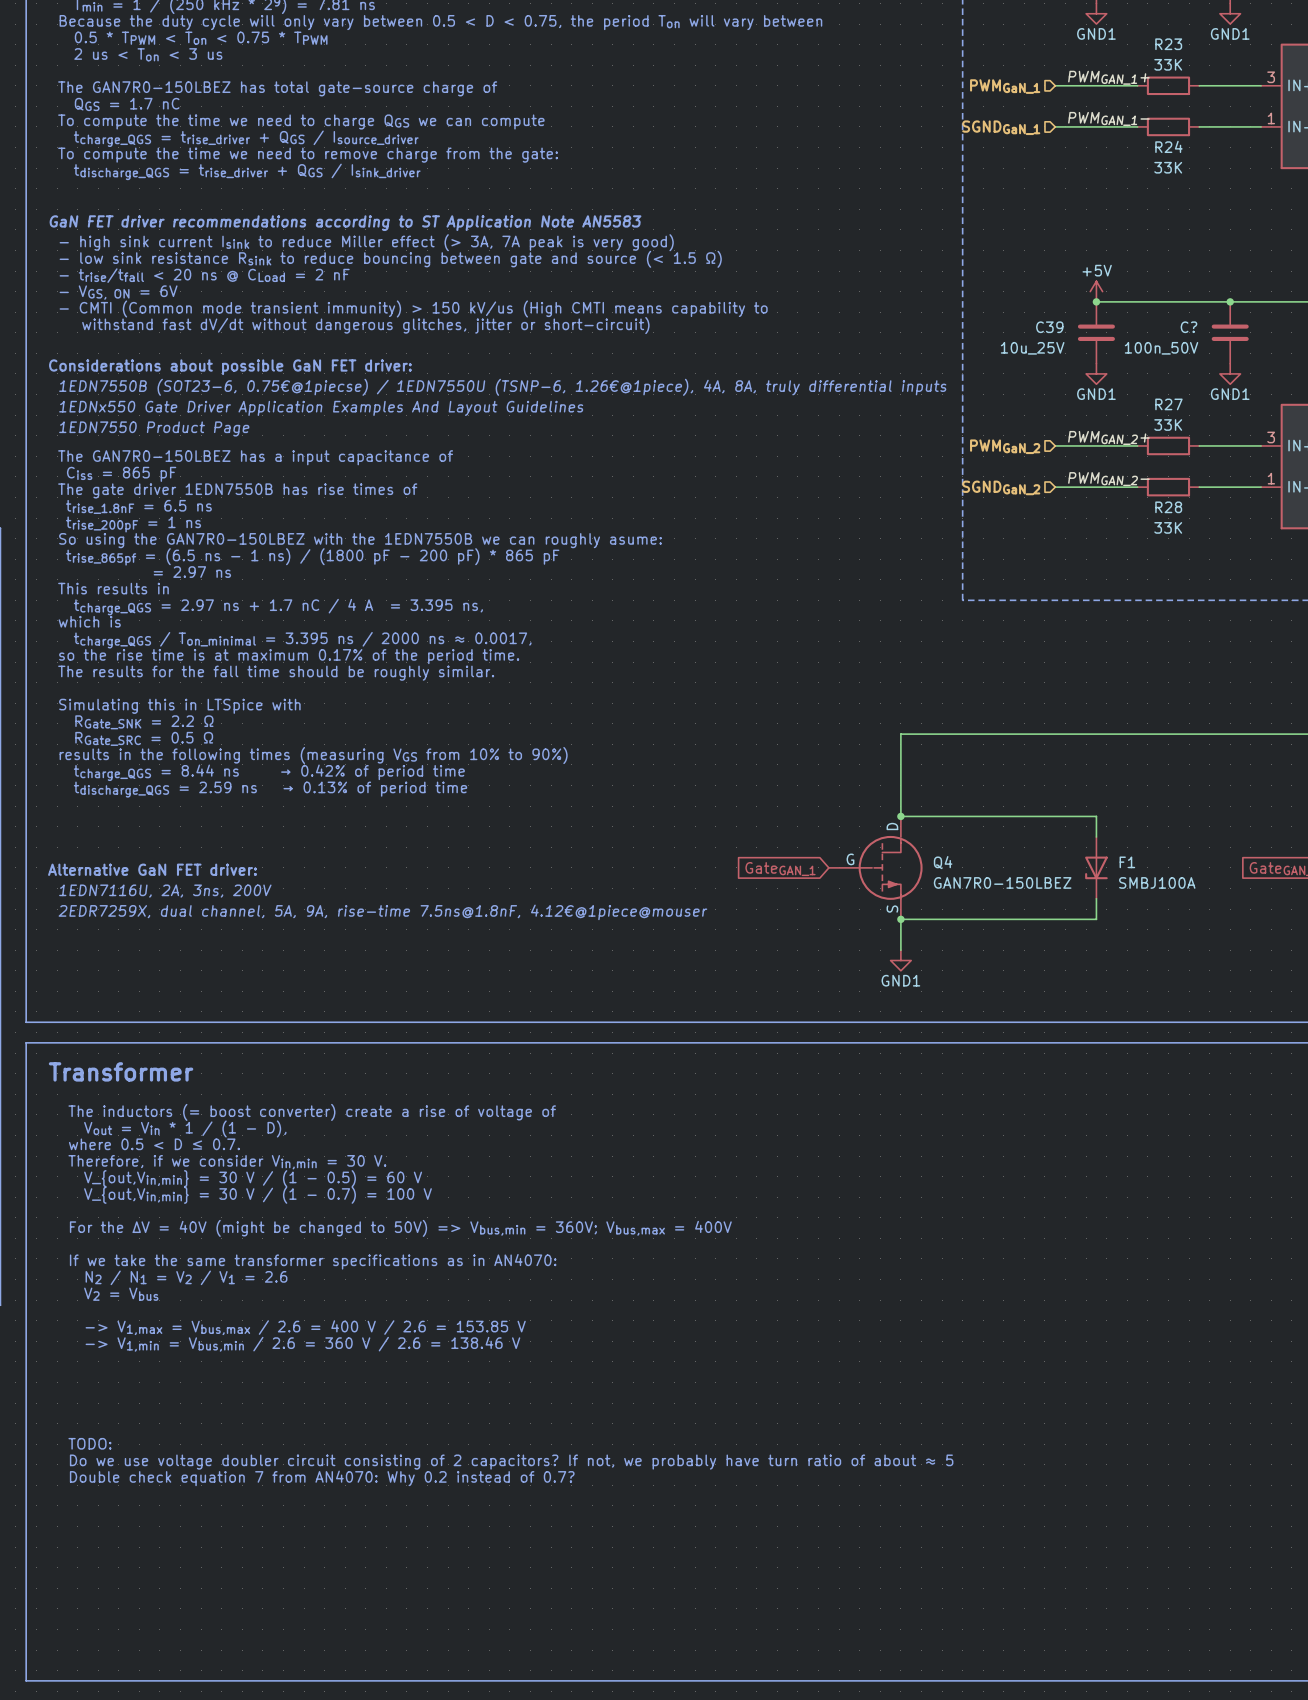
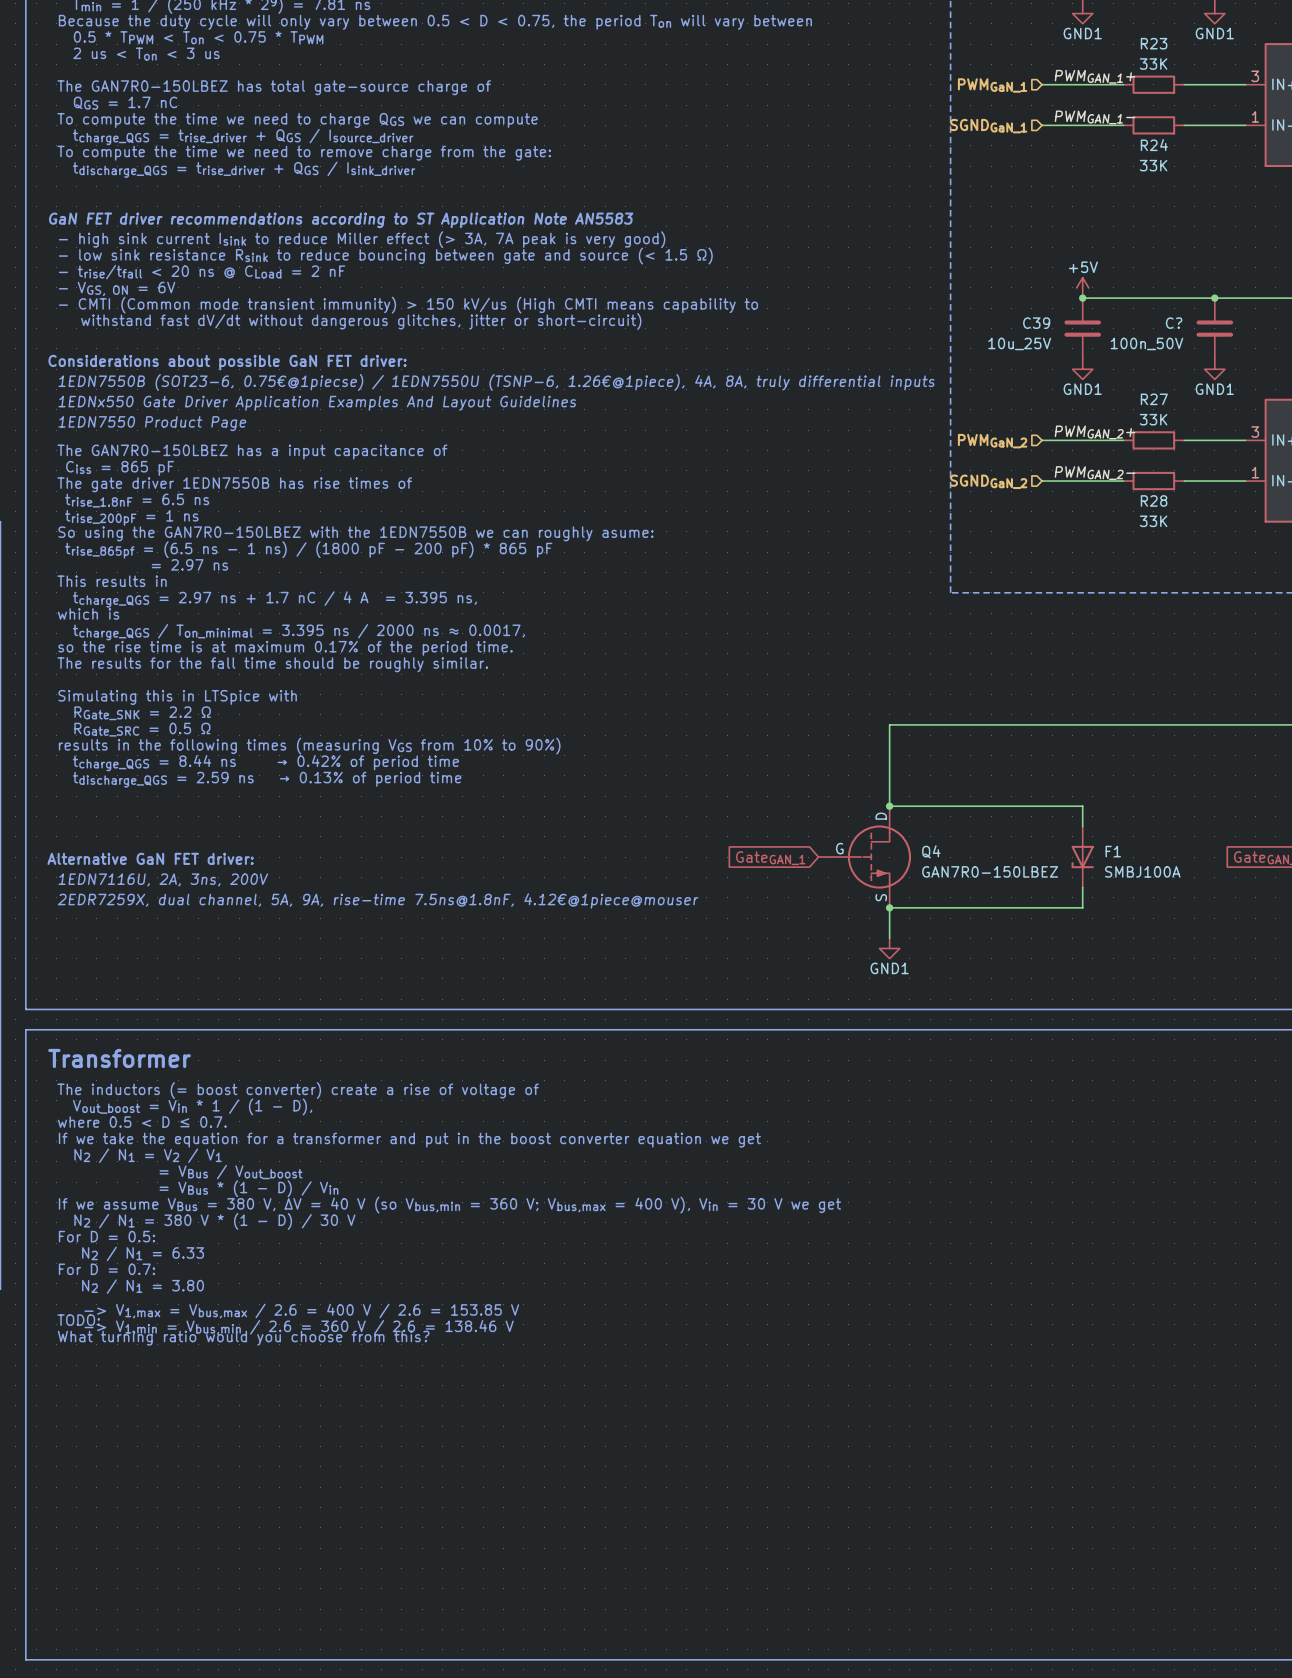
text position: The inductors (= boost converter) create a rise of voltage of (312, 1112) -> The inductors (= boost converter) create a rise of voltage of (298, 1090)
text: Vout = Vin * 1 / (1 - D), (185, 1128) -> Vout_boost = Vin * 1 / (1 - D), (192, 1106)
text position: where 0.5 < D ≤ 0.7. (154, 1144) -> where 0.5 < D ≤ 0.7. (142, 1122)
text: none -> If we take the equation for a transformer and put in the boost converter equation we get (409, 1140)
text: Therefore, if we consider Vin,min = 30 V. (227, 1162) -> none
text: none -> N2 / N1 = V2 / V1 (148, 1155)
text: V_{out,Vin,min} = 30 V / (1 - 0.5) = 60 V (253, 1178) -> none
text: none -> = VBus / Vout_boost (231, 1172)
text: V_{out,Vin,min} = 30 V / (1 - 0.7) = 100 V (257, 1195) -> none
text: none -> = VBus * (1 - D) / Vin (248, 1188)
text: none -> If we assume VBus = 380 V, ΔV = 40 V (so Vbus,min = 360 V; Vbus,max = 400 V), Vin = 30 V we get (449, 1205)
text: For the ΔV = 40V (might be changed to 50V) => Vbus,min = 360V; Vbus,max = 400V (400, 1228) -> none
text: none -> N2 / N1 = 380 V * (1 - D) / 30 V (214, 1221)
text: none -> For D = 0.5: (106, 1236)
text: If we take the same transformer specifications as in AN4070: (313, 1261) -> none
text: N2 / N1 = V2 / V1 = 2.6 (186, 1277) -> N2 / N1 = 6.33 (143, 1253)
text: none -> For D = 0.7: (106, 1269)
text: V2 = Vbus (121, 1294) -> none
text: none -> N2 / N1 = 3.80 (143, 1286)
text: none -> What turning ratio would you choose from this? (243, 1338)
text position: TODO: (89, 1443) -> TODO: (78, 1320)
text: Do we use voltage doubler circuit consisting of 2 capacitors? If not, we probably have turn ratio of about ≈ 5 (511, 1462) -> none
text: Double check equation 7 from AN4070: Why 0.2 instead of 0.7? (322, 1478) -> none

